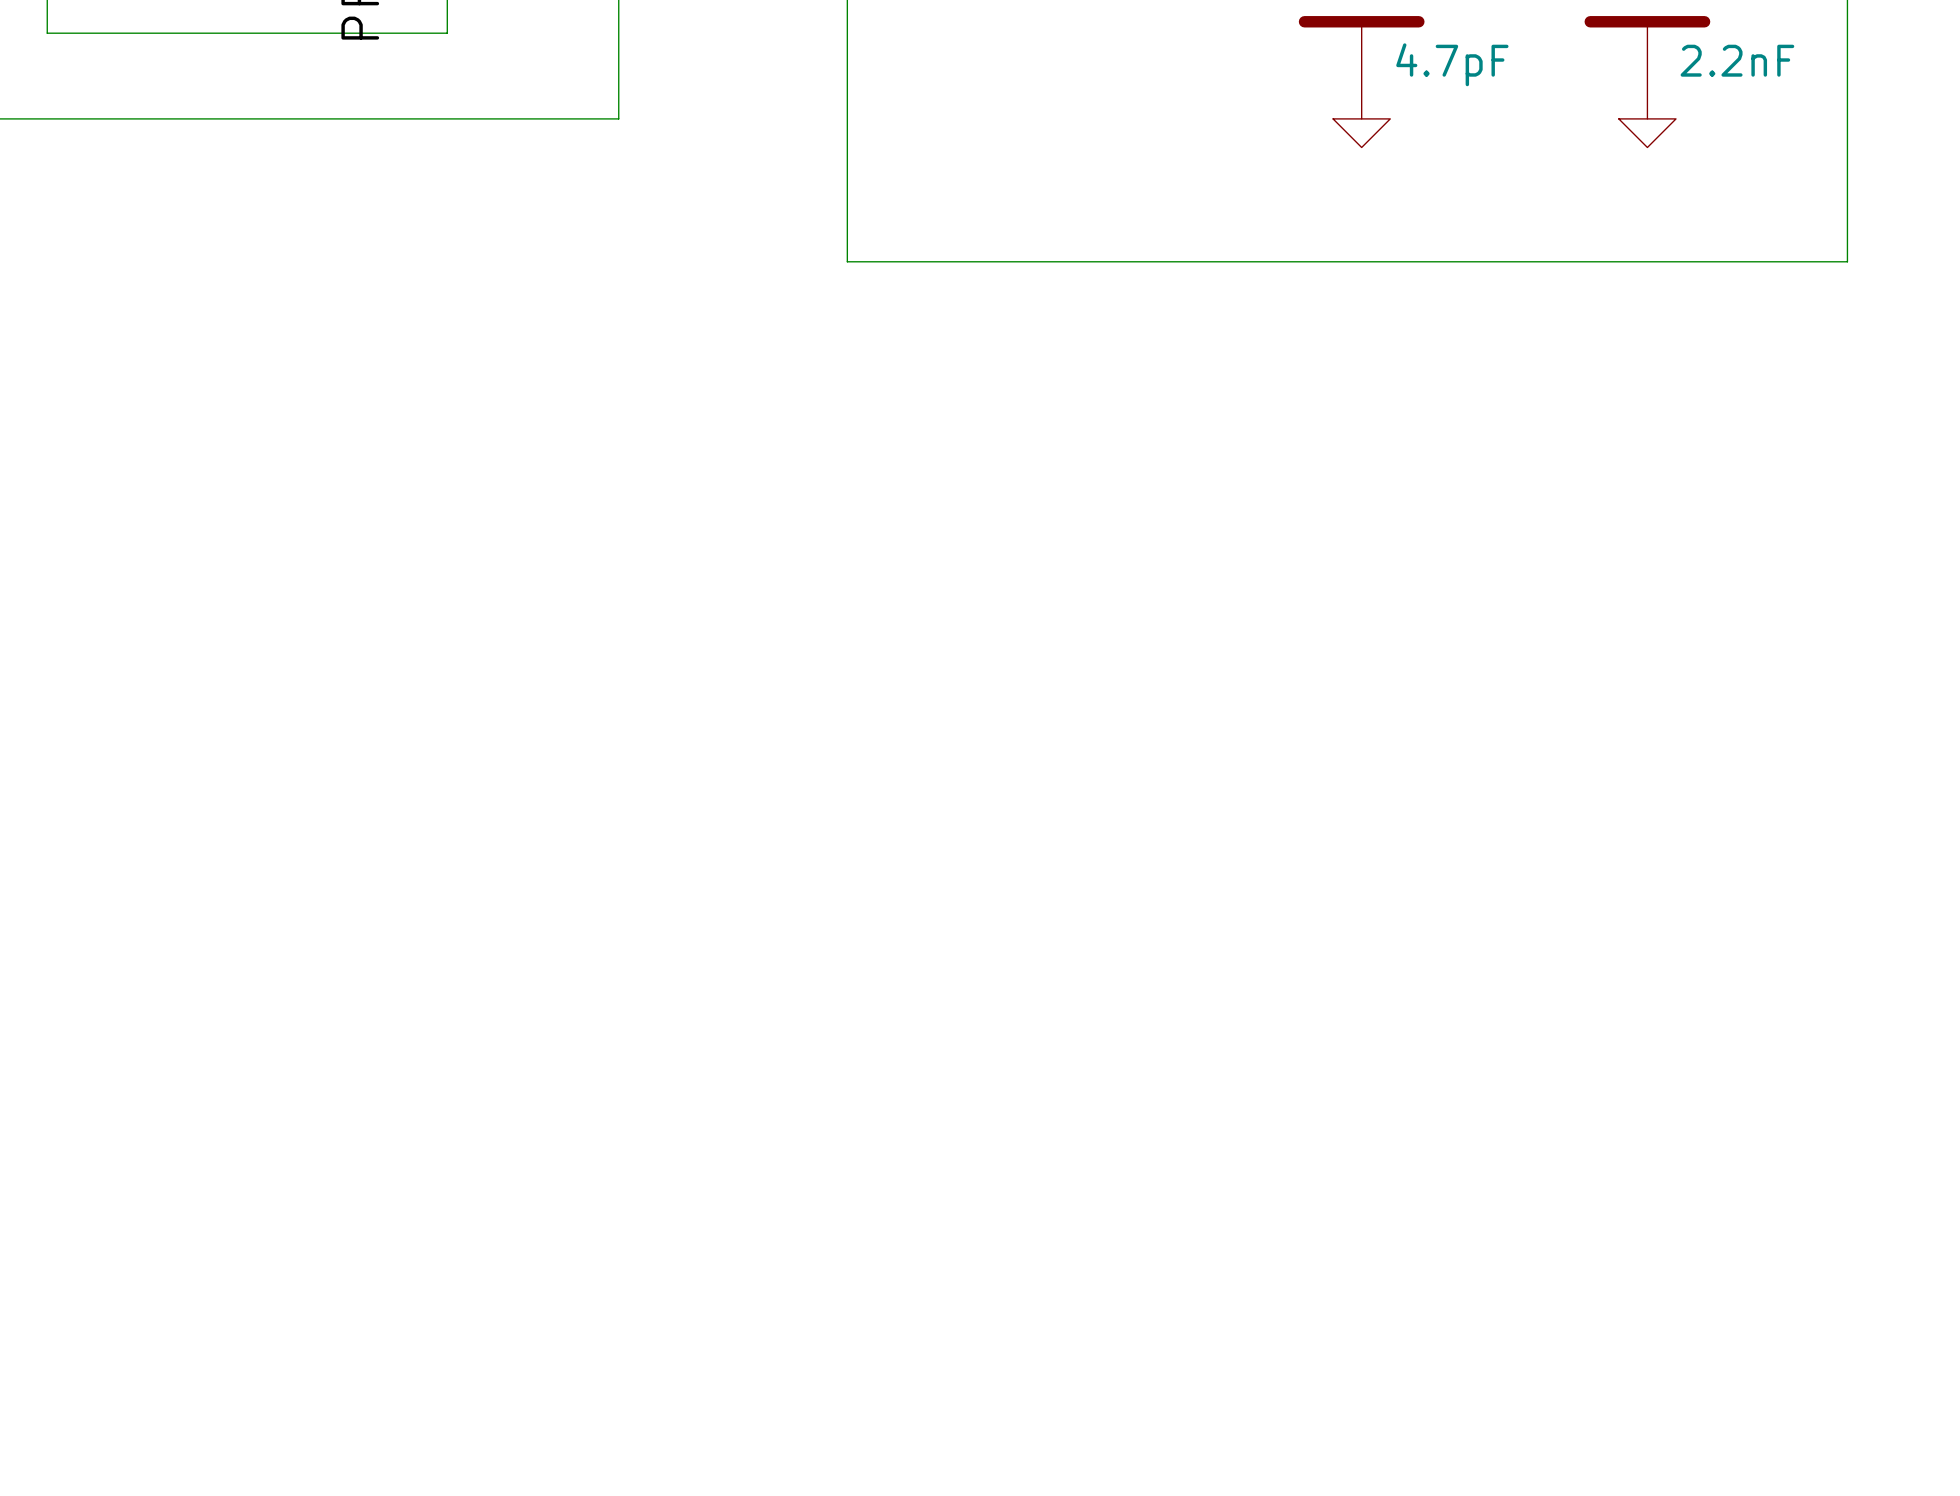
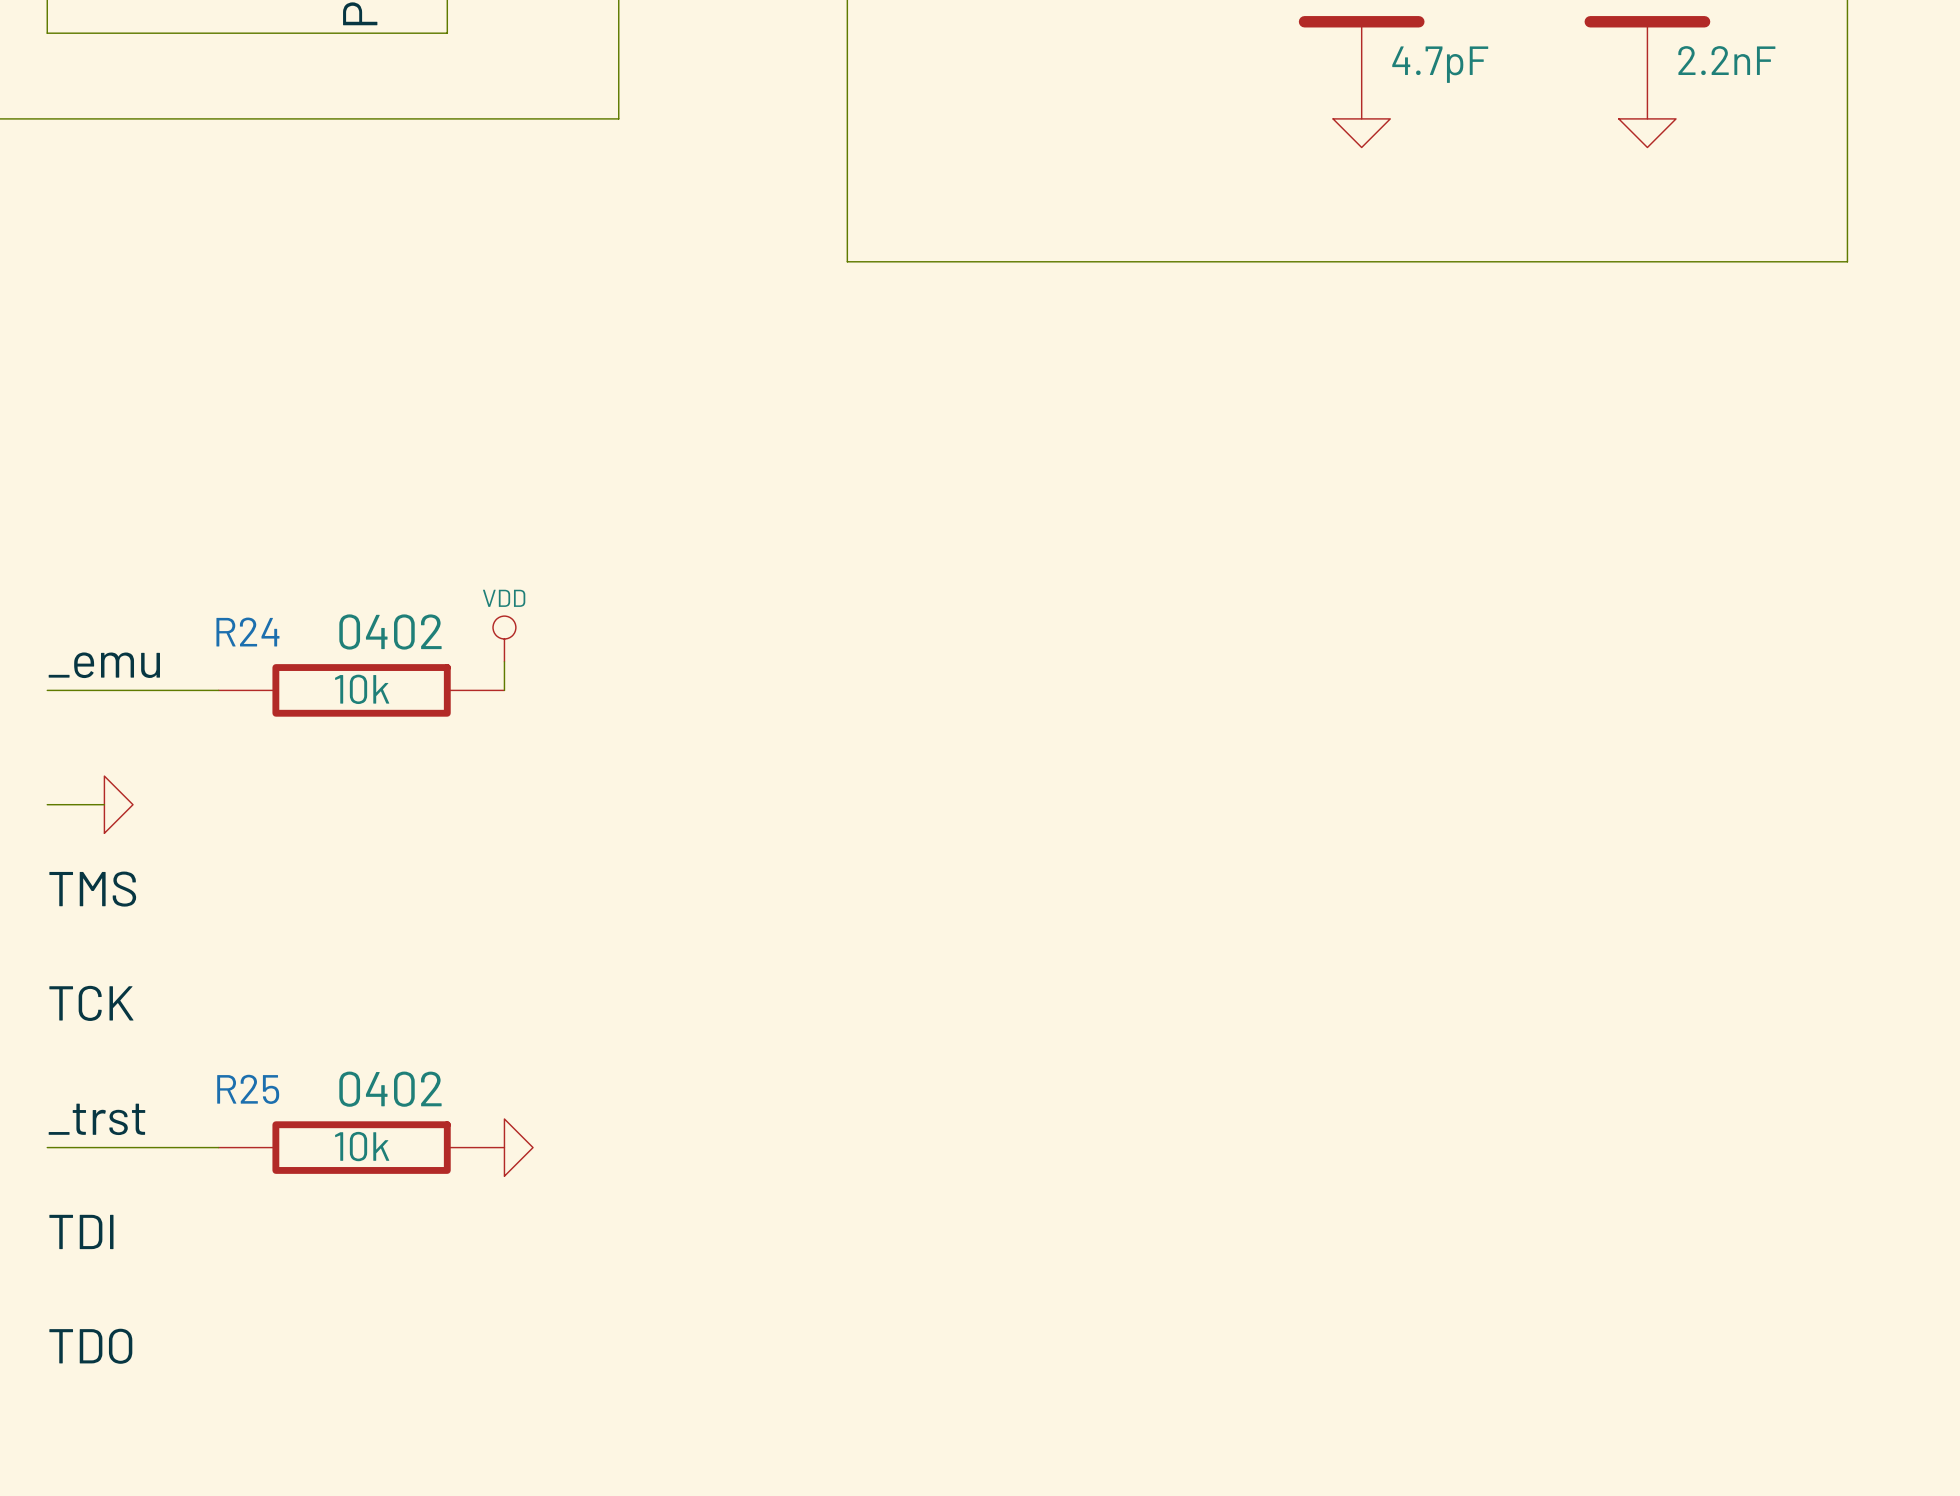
power symbol: none -> VDD (504, 638)
wire: none -> (504, 661) (504, 690)
label: none -> _emu (104, 665)
wire: none -> (47, 690) (218, 690)
R24: none -> 10k (361, 690)
wire: none -> (47, 804) (104, 804)
power symbol: none -> (118, 804)
label: none -> TMS (92, 889)
label: none -> TCK (91, 1003)
label: none -> _trst (96, 1119)
wire: none -> (47, 1147) (218, 1147)
R25: none -> 10k (361, 1147)
power symbol: none -> (518, 1147)
label: none -> TDI (81, 1231)
label: none -> TDO (90, 1346)

